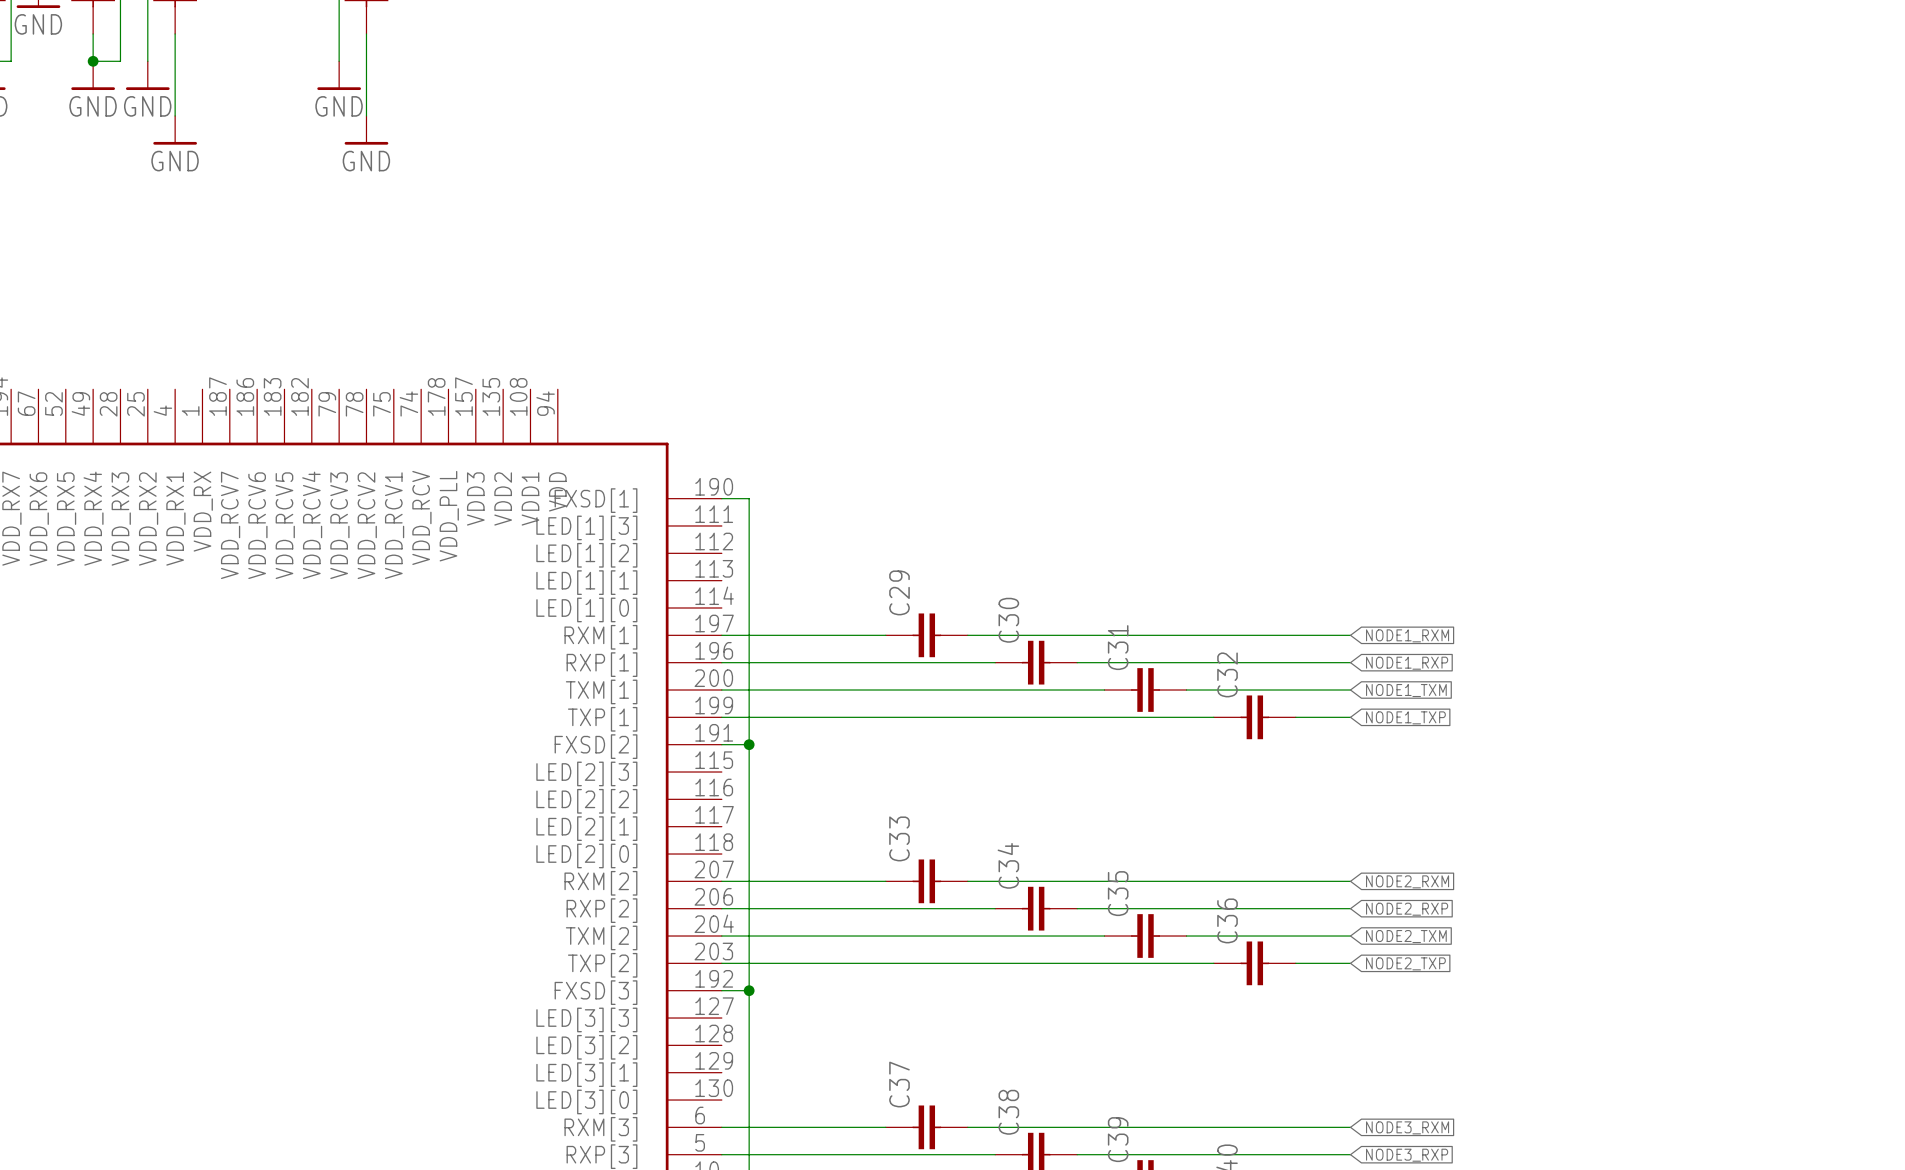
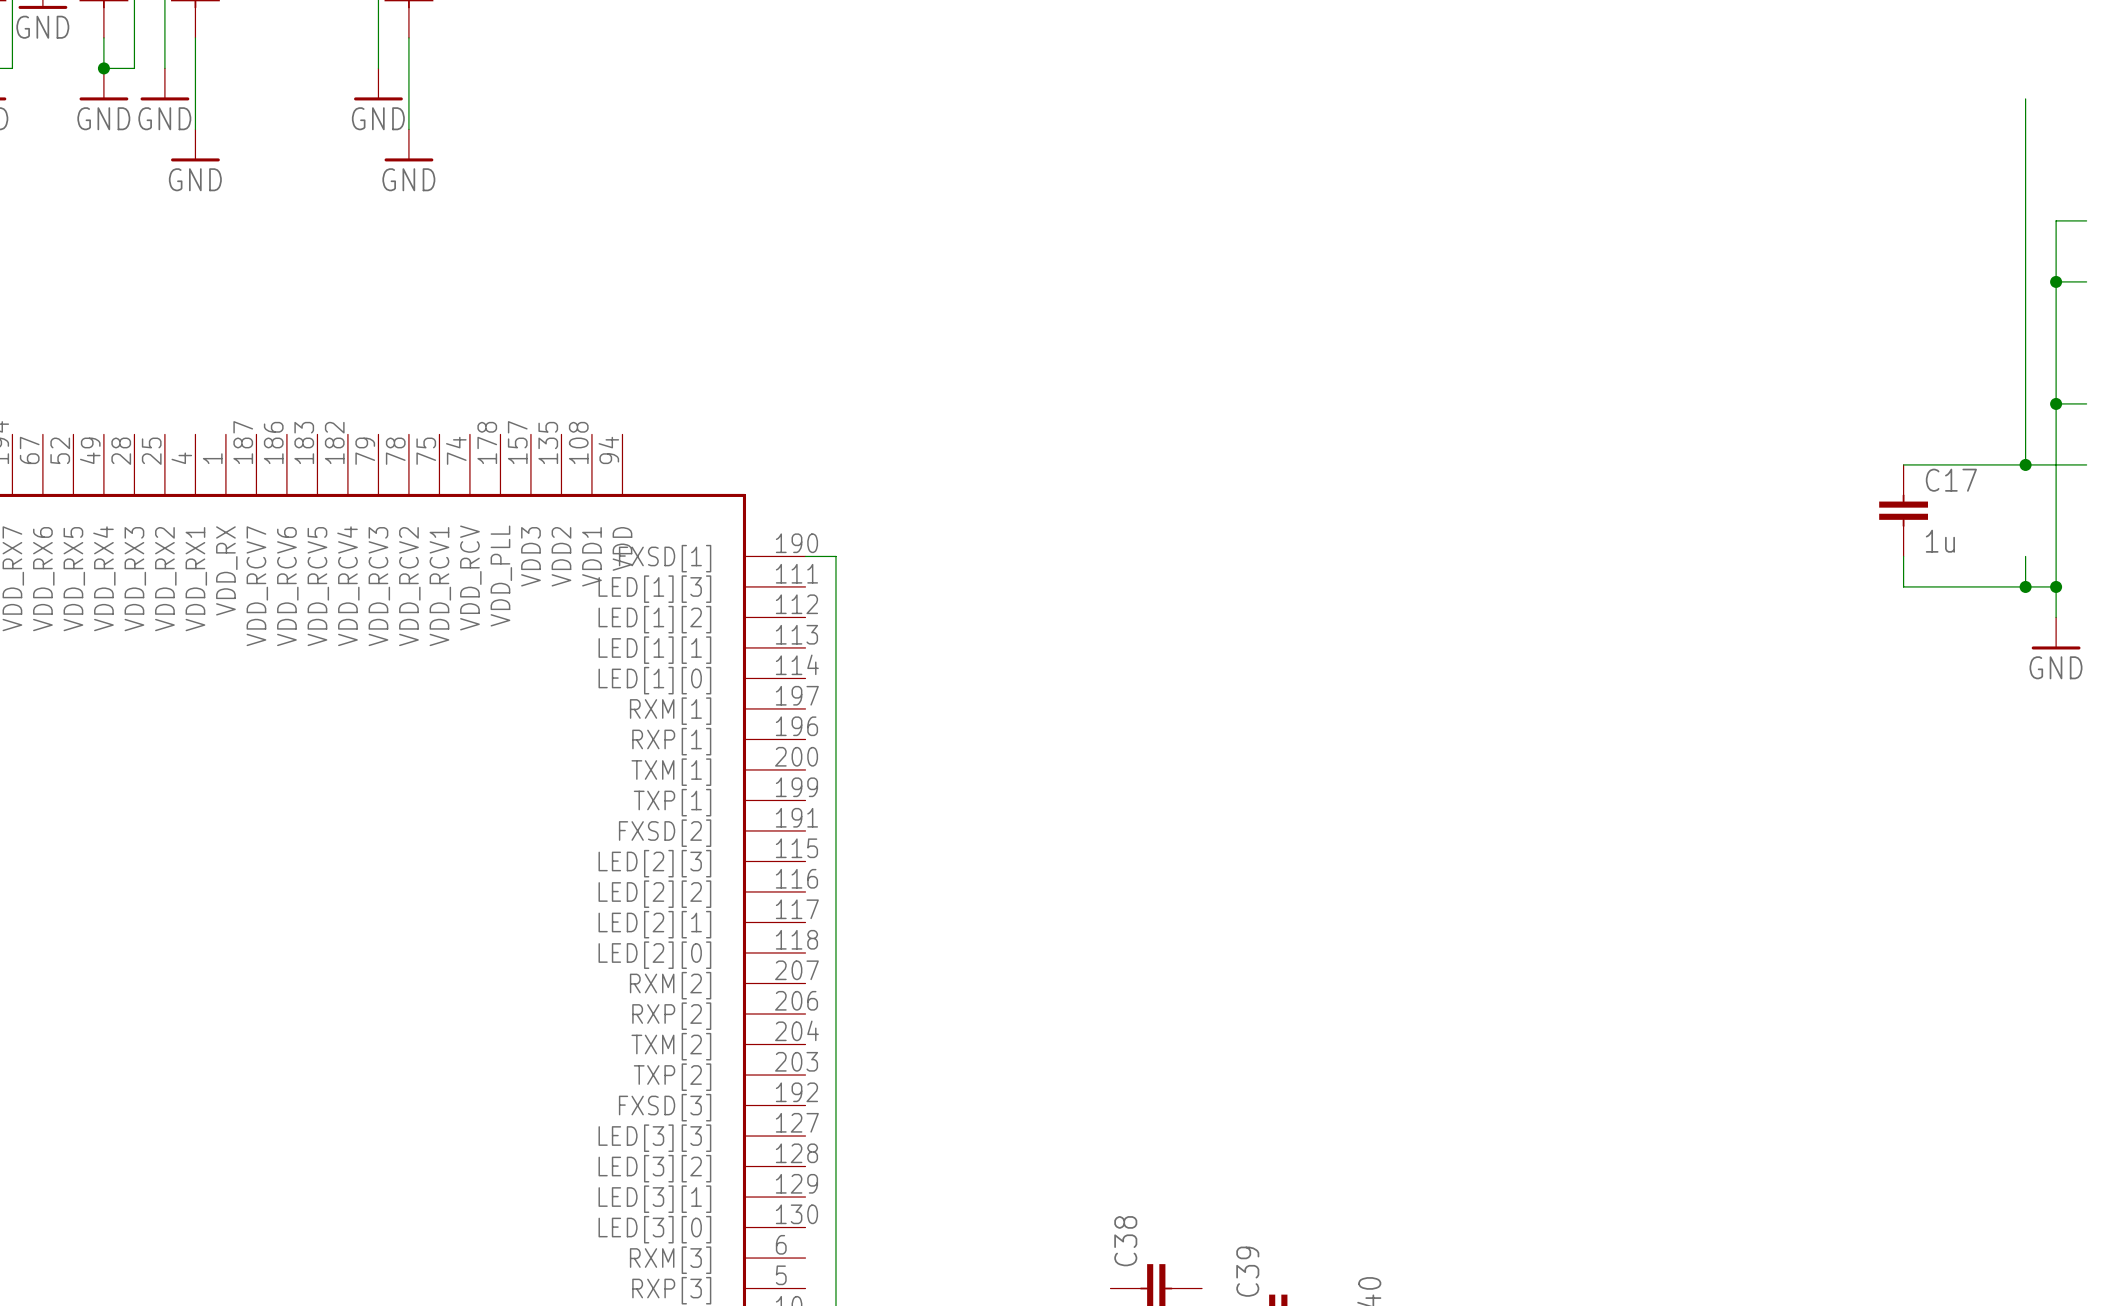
wire: none -> (2025, 98) (2025, 464)
wire: none -> (2086, 220) (2056, 220) (2056, 617)
wire: none -> (2056, 281) (2086, 281)
junction: none -> (2056, 281)
wire: none -> (2056, 403) (2086, 403)
junction: none -> (2056, 403)
wire: none -> (1903, 464) (2086, 464)
junction: none -> (2025, 464)
C17: none -> 1u (1903, 510)
wire: none -> (1903, 556) (1903, 586) (2056, 586)
wire: none -> (2025, 556) (2025, 586)
junction: none -> (2025, 586)
junction: none -> (2056, 586)
power symbol: none -> GND (2056, 633)
wire: (721, 635) (885, 635) -> none
C29: (926, 635) -> none
wire: (967, 635) (1350, 635) -> none
global label: NODE1_RXM (1407, 635) -> none
wire: (721, 662) (995, 662) -> none
C30: (1036, 662) -> none
wire: (1077, 662) (1350, 662) -> none
global label: NODE1_RXP (1407, 663) -> none
wire: (721, 690) (1104, 690) -> none
C31: (1145, 690) -> none
wire: (1186, 690) (1350, 690) -> none
global label: NODE1_TXM (1406, 690) -> none
wire: (721, 717) (1213, 717) -> none
C32: (1254, 717) -> none
wire: (1295, 717) (1350, 717) -> none
global label: NODE1_TXP (1405, 717) -> none
wire: (721, 744) (749, 744) -> none
junction: (749, 744) -> none
wire: (721, 881) (885, 881) -> none
C33: (926, 881) -> none
wire: (967, 881) (1350, 881) -> none
global label: NODE2_RXM (1407, 881) -> none
wire: (721, 908) (995, 908) -> none
C34: (1036, 908) -> none
wire: (1077, 908) (1350, 908) -> none
global label: NODE2_RXP (1407, 909) -> none
wire: (721, 936) (1104, 936) -> none
C35: (1145, 936) -> none
wire: (1186, 936) (1350, 936) -> none
global label: NODE2_TXM (1406, 936) -> none
wire: (721, 963) (1213, 963) -> none
C36: (1254, 963) -> none
wire: (1295, 963) (1350, 963) -> none
global label: NODE2_TXP (1405, 963) -> none
wire: (721, 990) (749, 990) -> none
junction: (749, 990) -> none
wire: (721, 1127) (885, 1127) -> none
C37: (926, 1127) -> none
wire: (967, 1127) (1350, 1127) -> none
global label: NODE3_RXM (1407, 1127) -> none
wire: (721, 1154) (995, 1154) -> none
wire: (1077, 1154) (1350, 1154) -> none
global label: NODE3_RXP (1407, 1155) -> none

